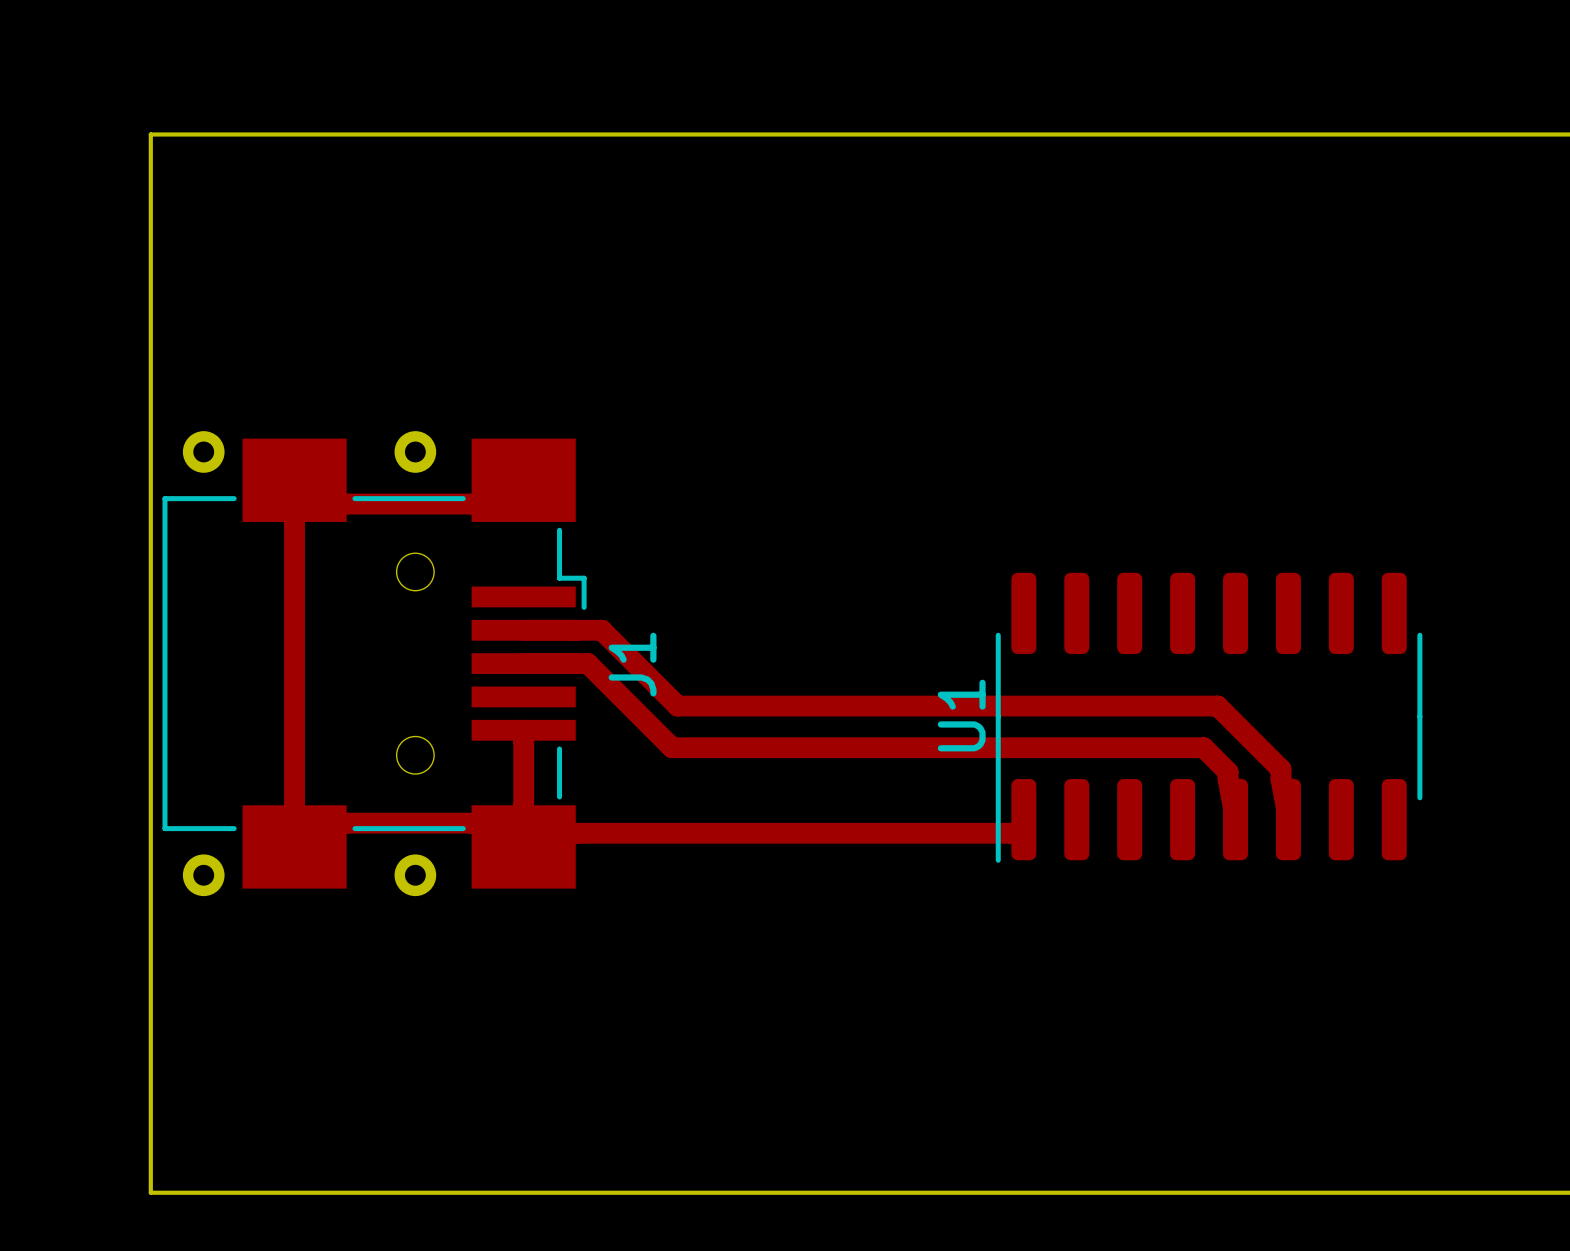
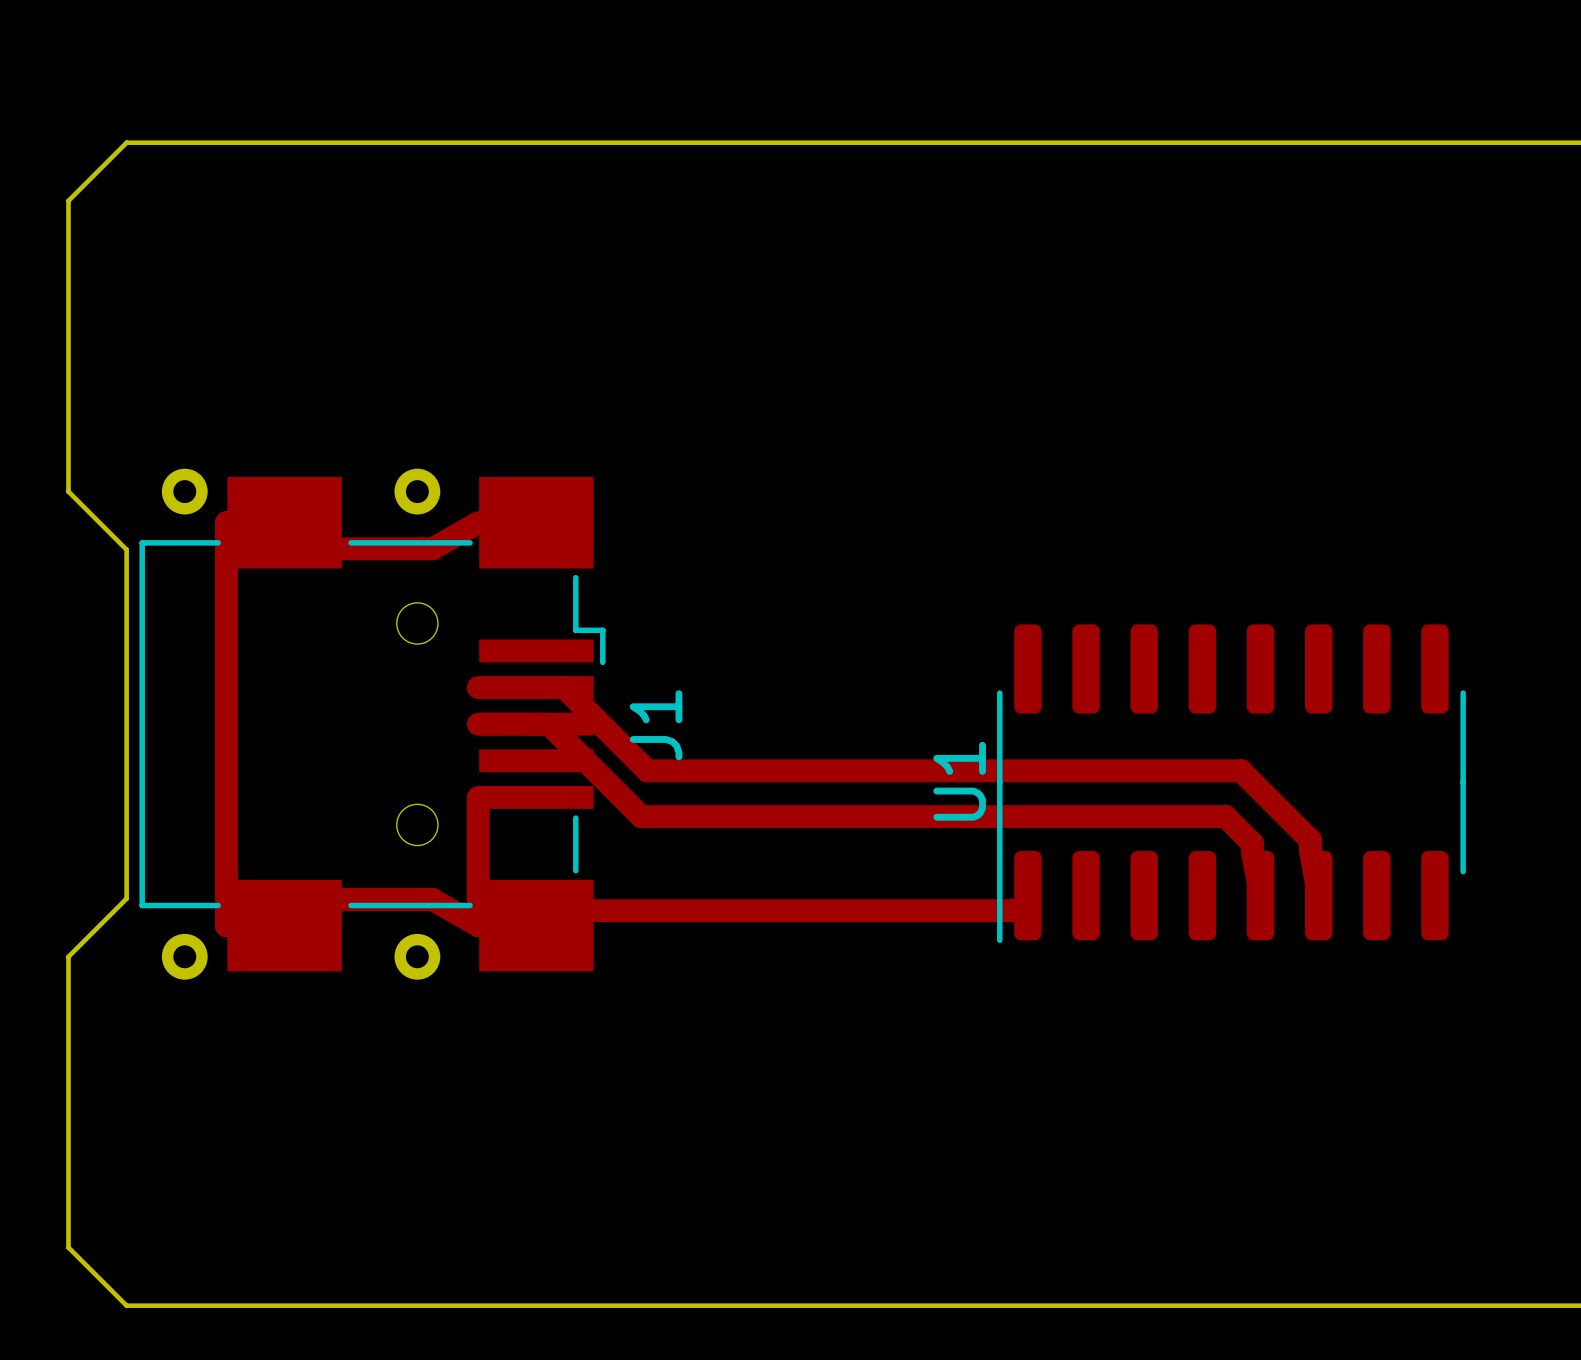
board edge: (203, 134) (150, 134) (150, 187) -> (126, 142) (68, 200)
board edge: (150, 451) (150, 875) -> (68, 491) (126, 549) (126, 898) (68, 956)
J1 position: (374, 663) -> (372, 724)
board edge: (150, 1139) (150, 1192) (203, 1192) -> (68, 1247) (126, 1305)

